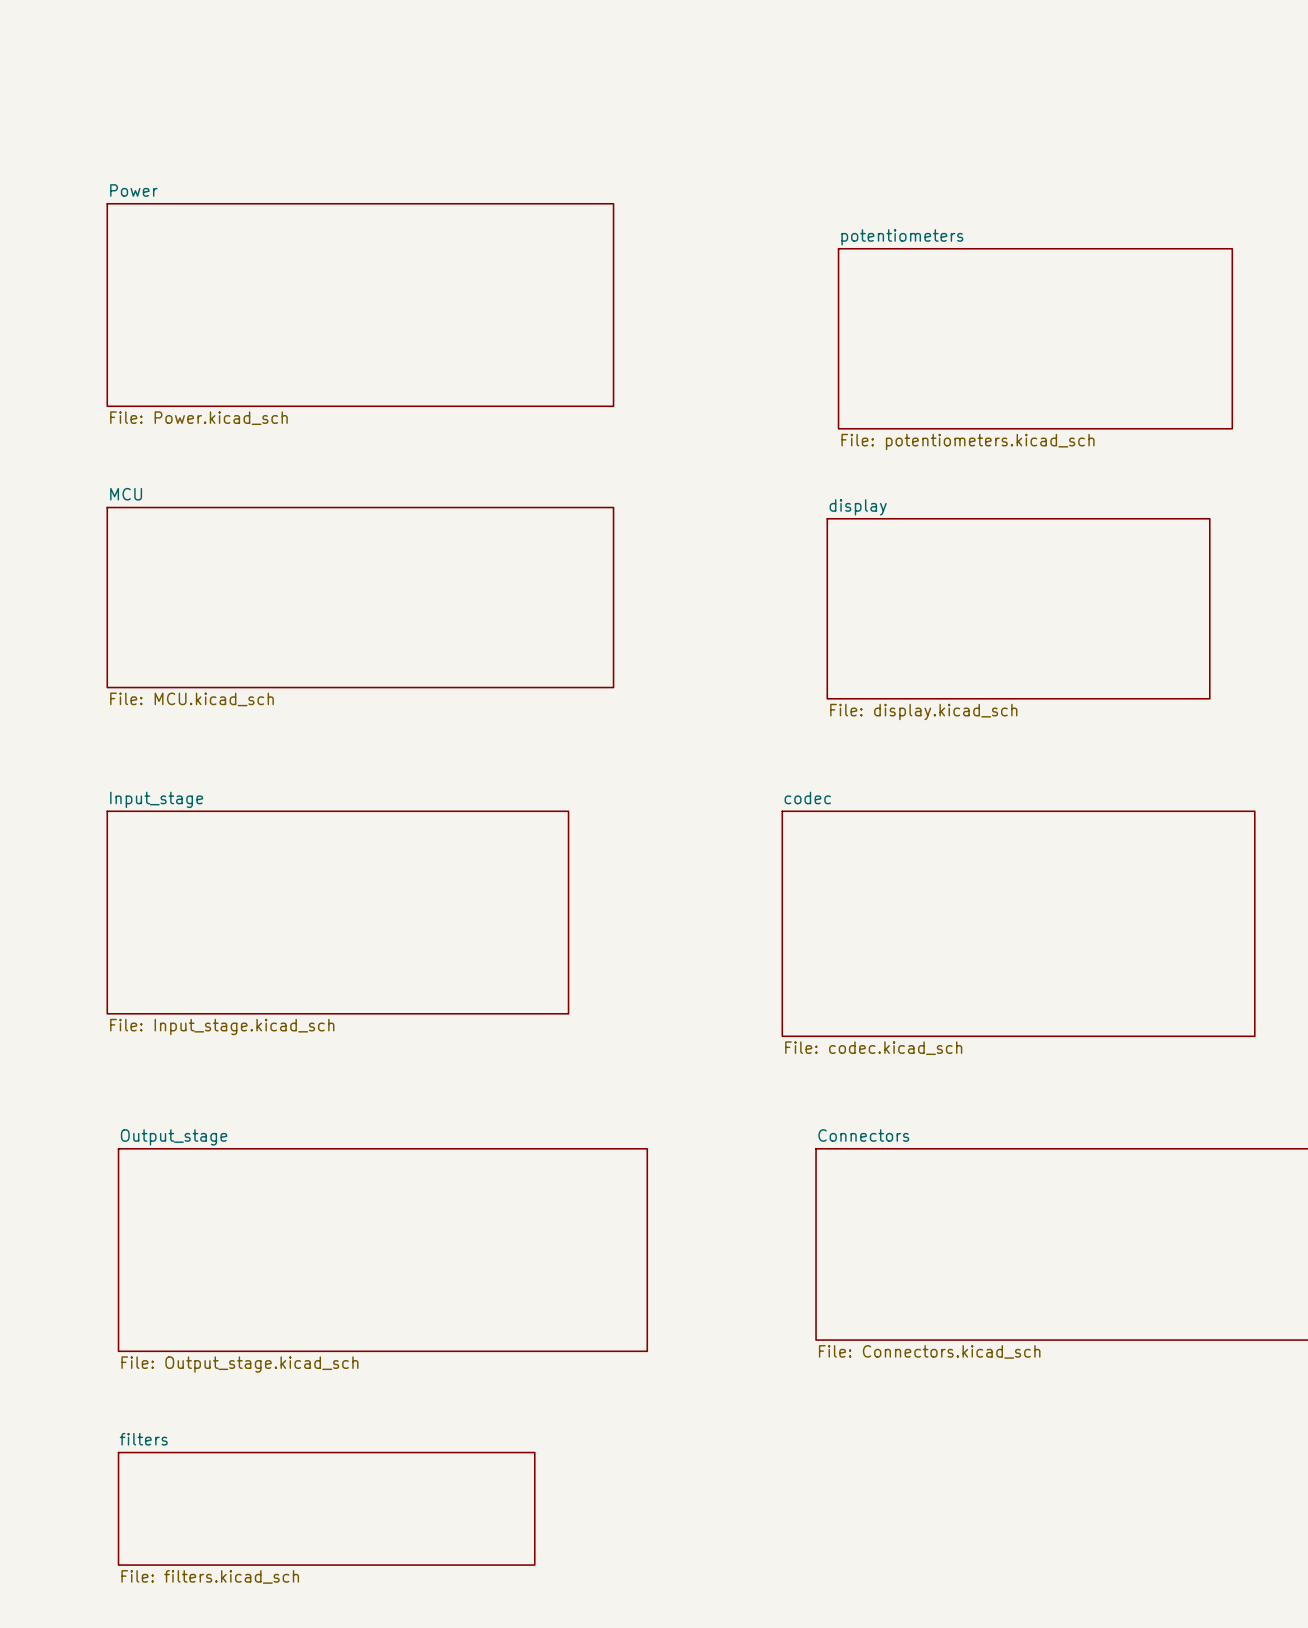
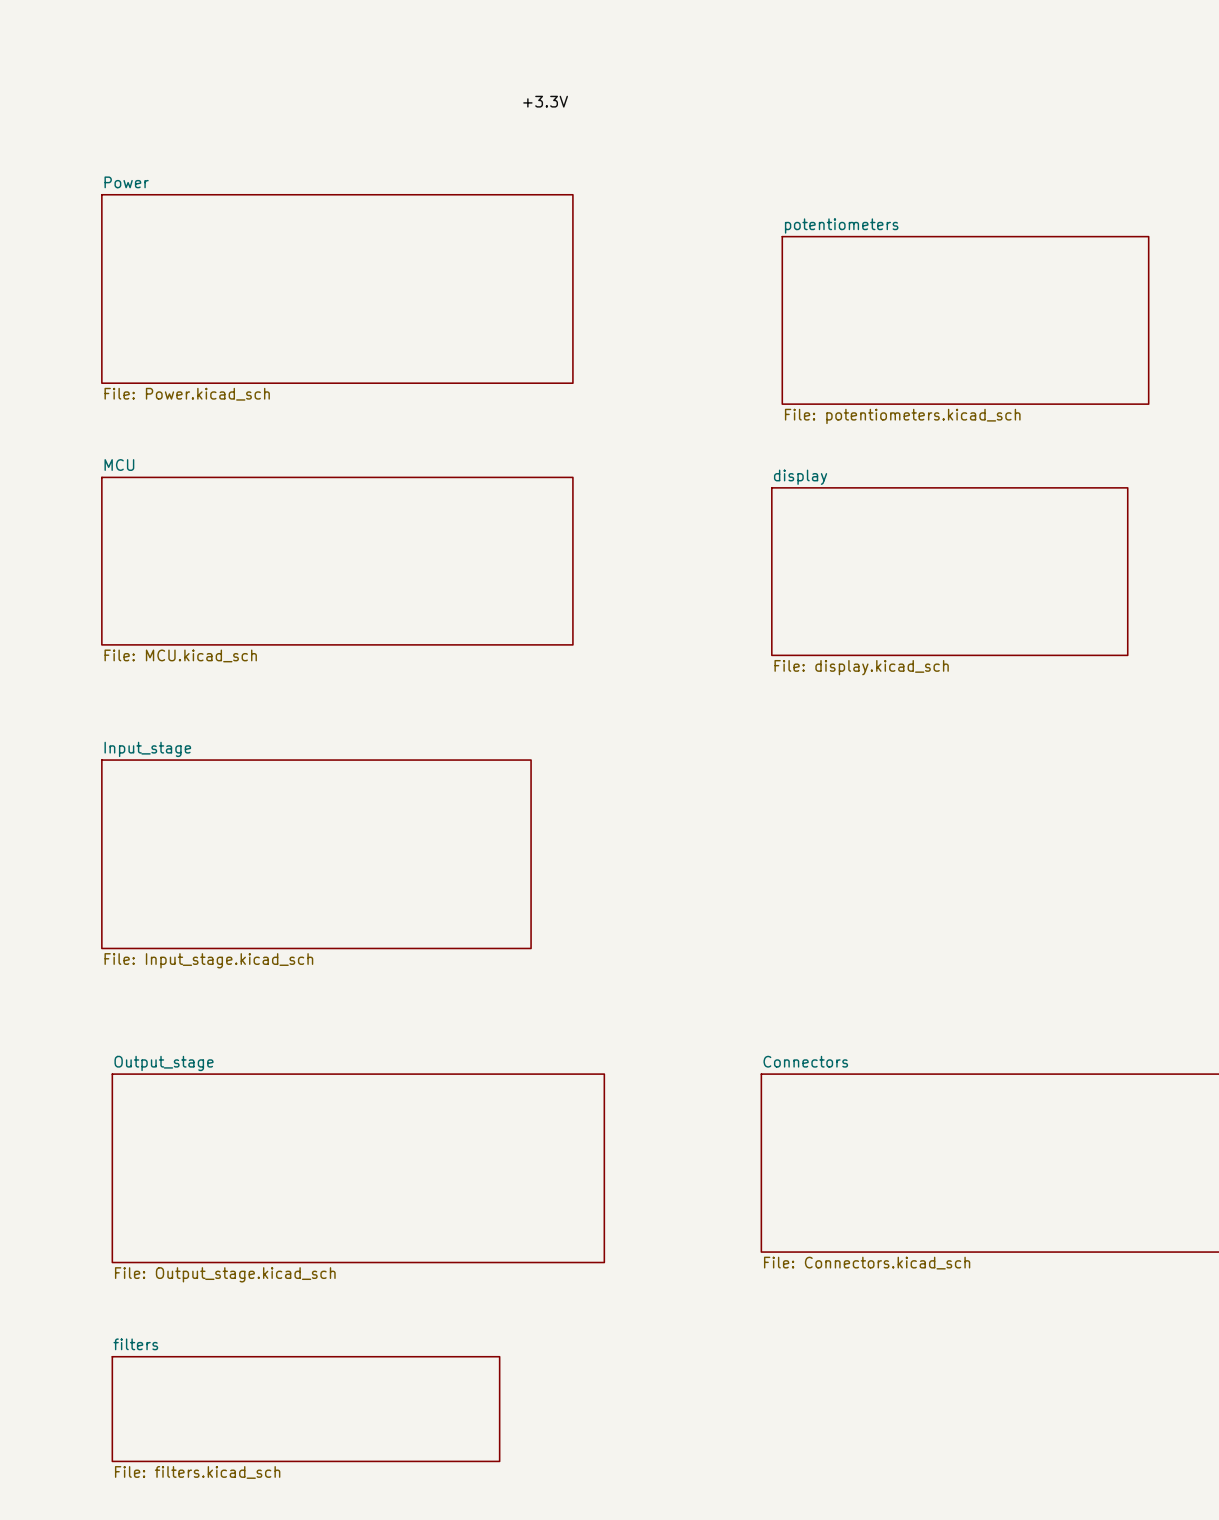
label: none -> +3.3V (545, 101)
sheet codec: File: codec.kicad_sch (1018, 923) -> none

